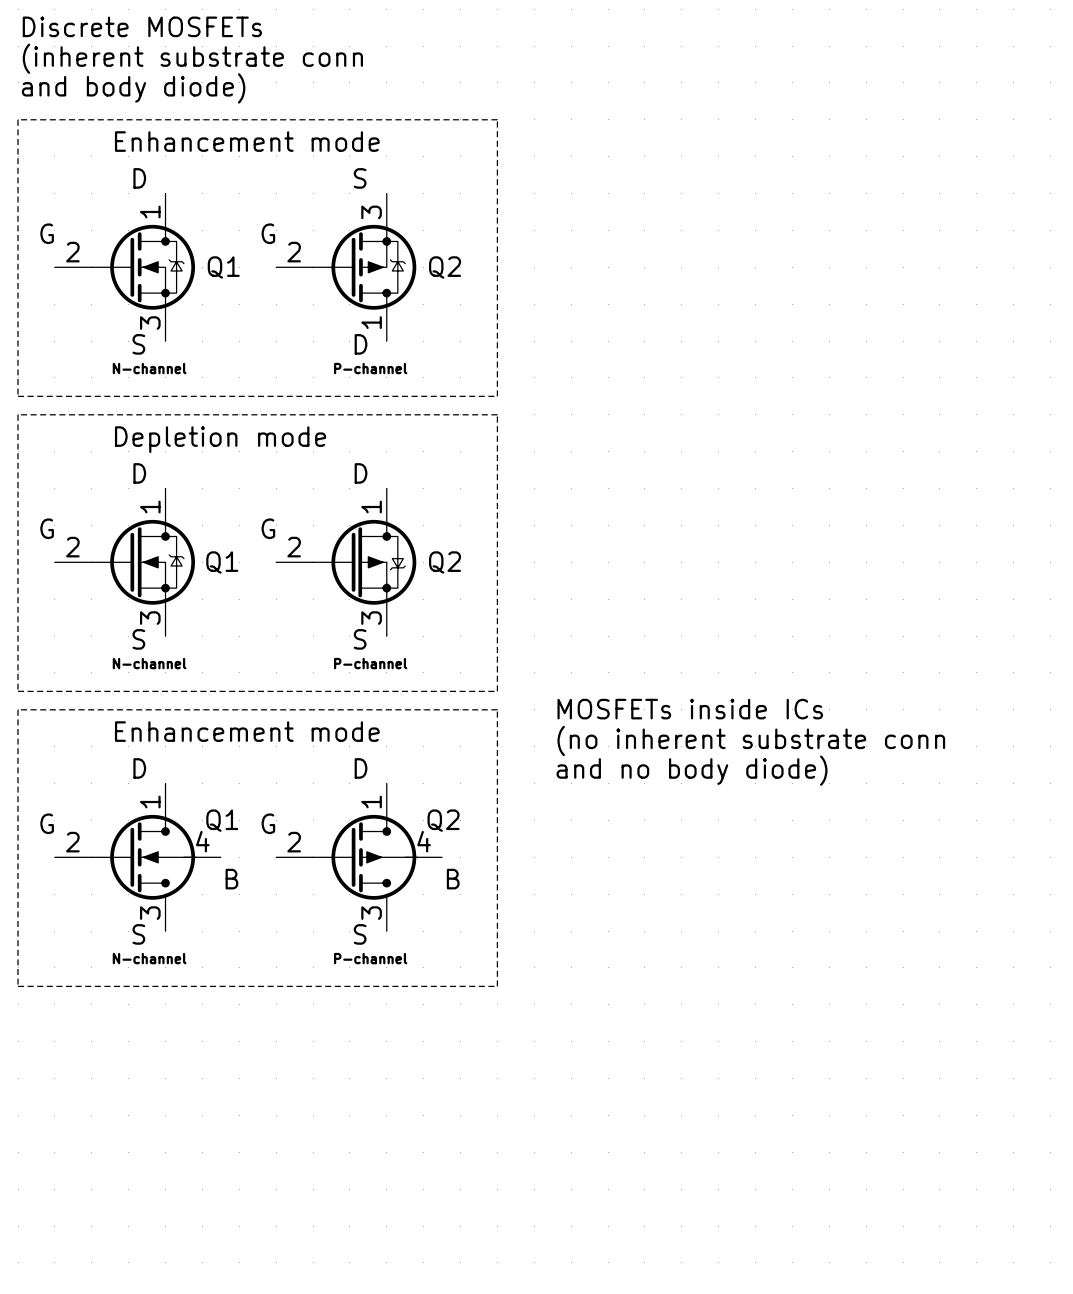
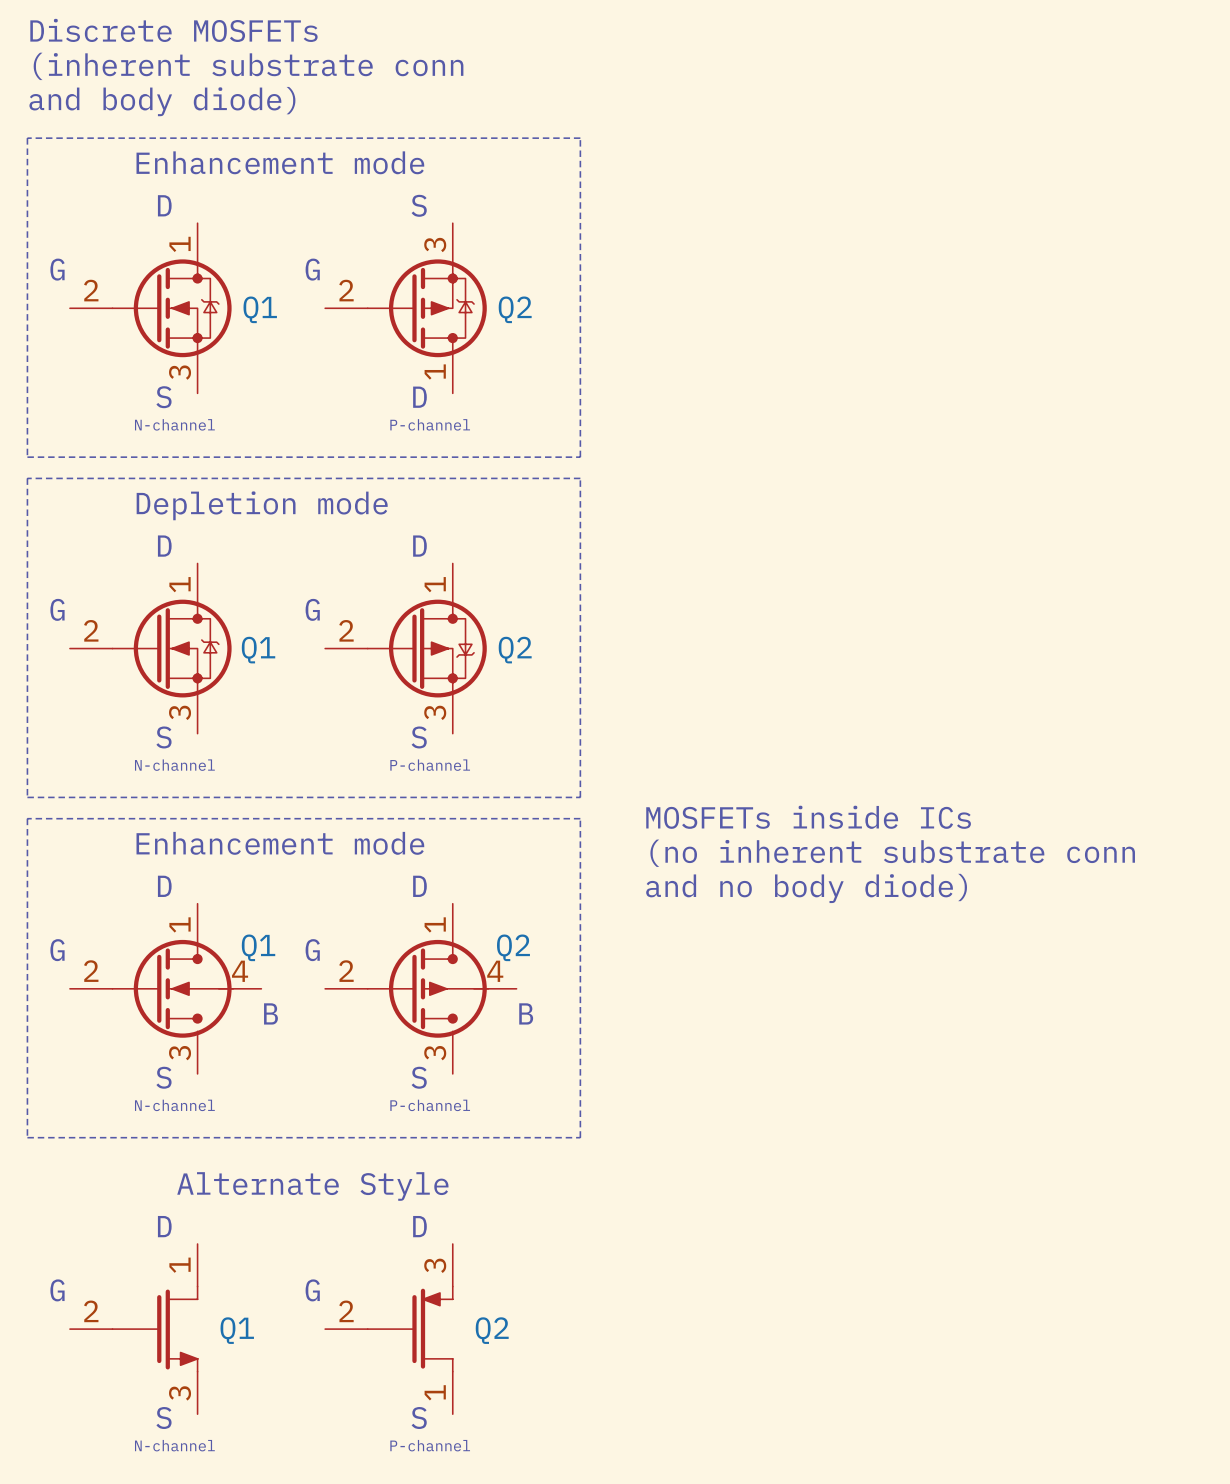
text: none -> Alternate Style (312, 1186)
text: none -> D (164, 1226)
text: none -> D (419, 1226)
text: none -> G (57, 1290)
text: none -> G (312, 1290)
Q1: none -> (133, 1329)
Q2: none -> (388, 1329)
text: none -> S (163, 1418)
text: none -> S (419, 1418)
text: none -> N-channel (174, 1445)
text: none -> P-channel (430, 1445)

